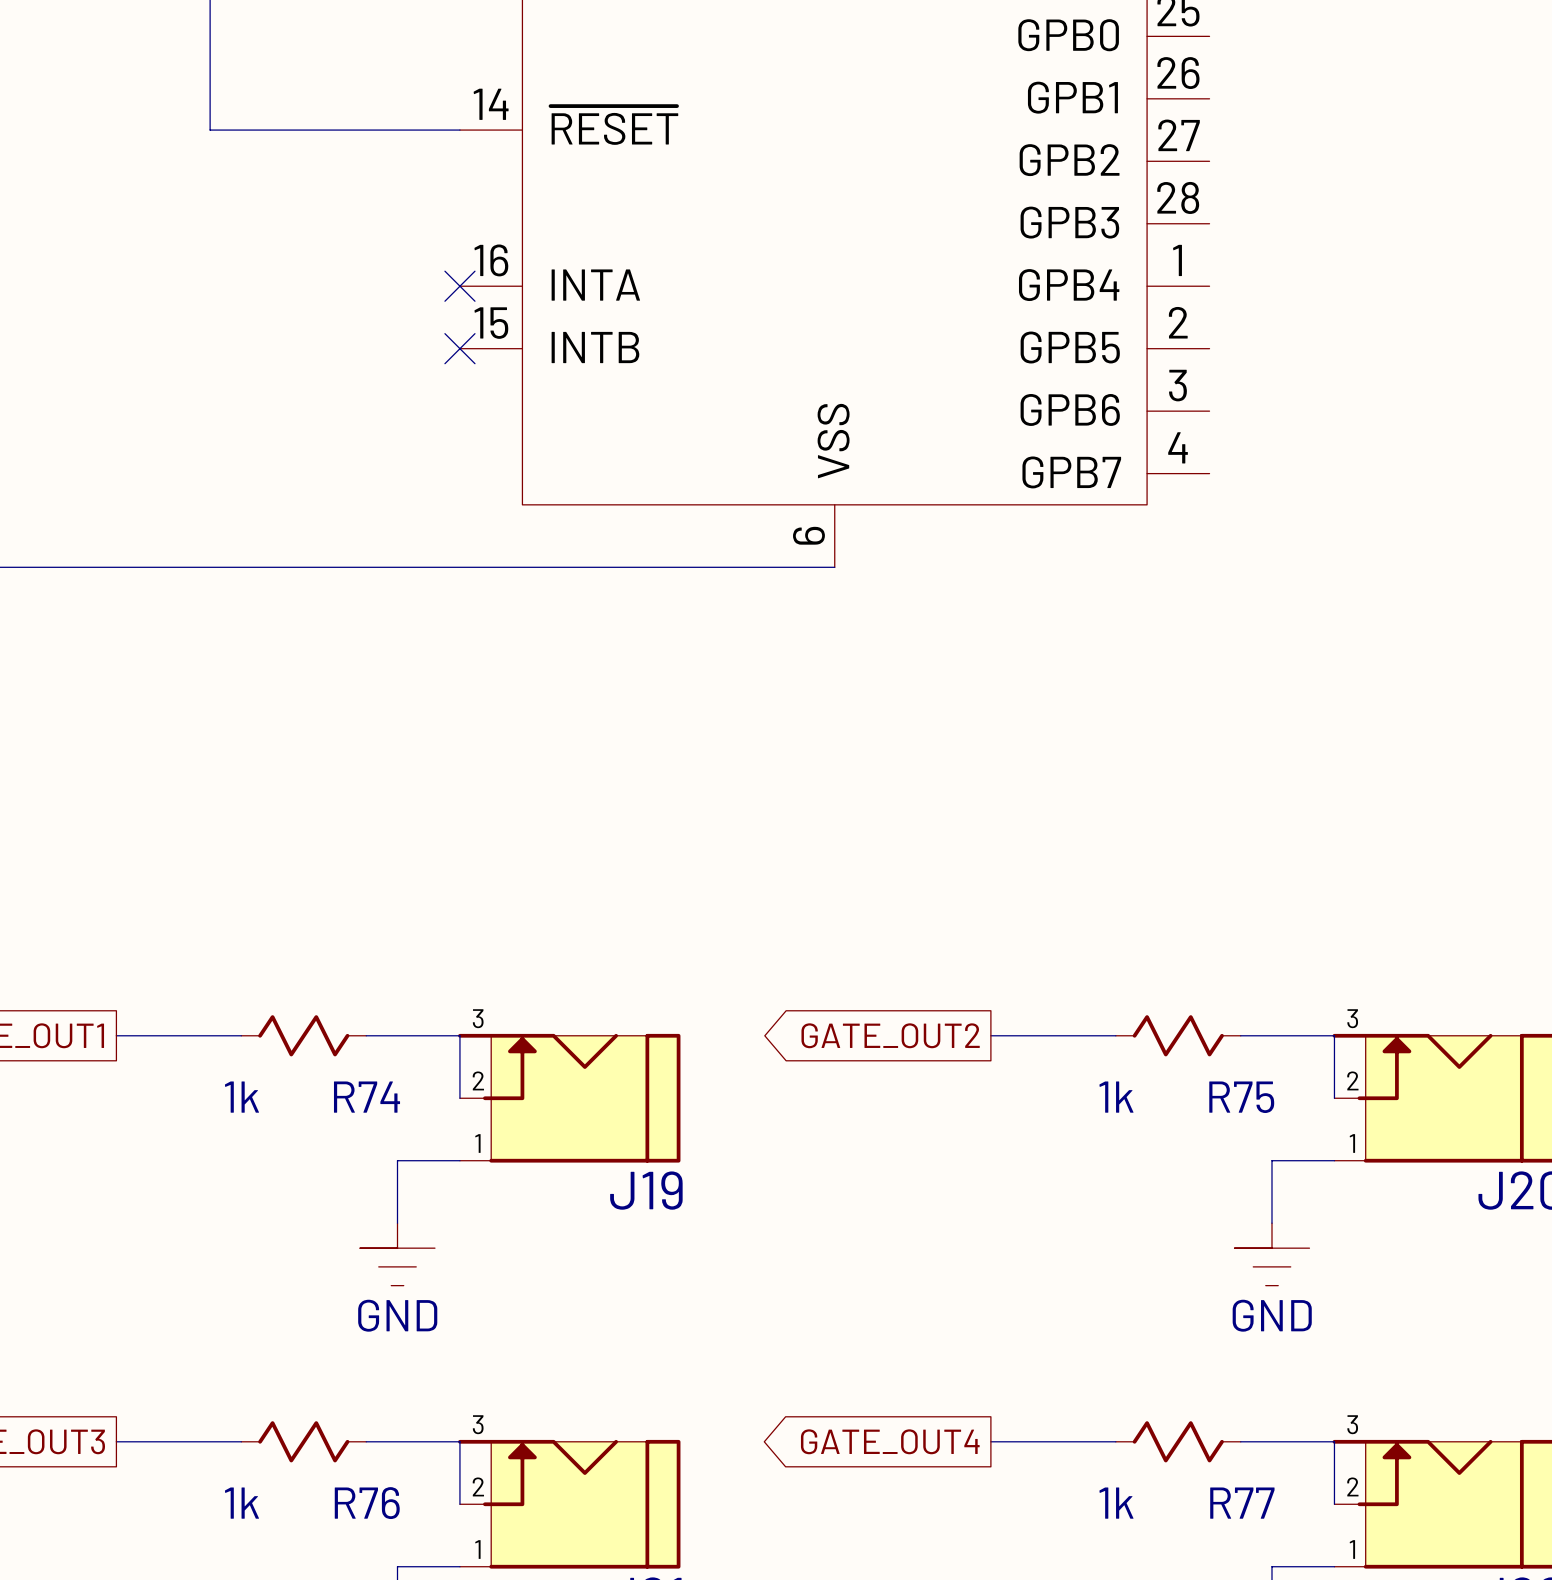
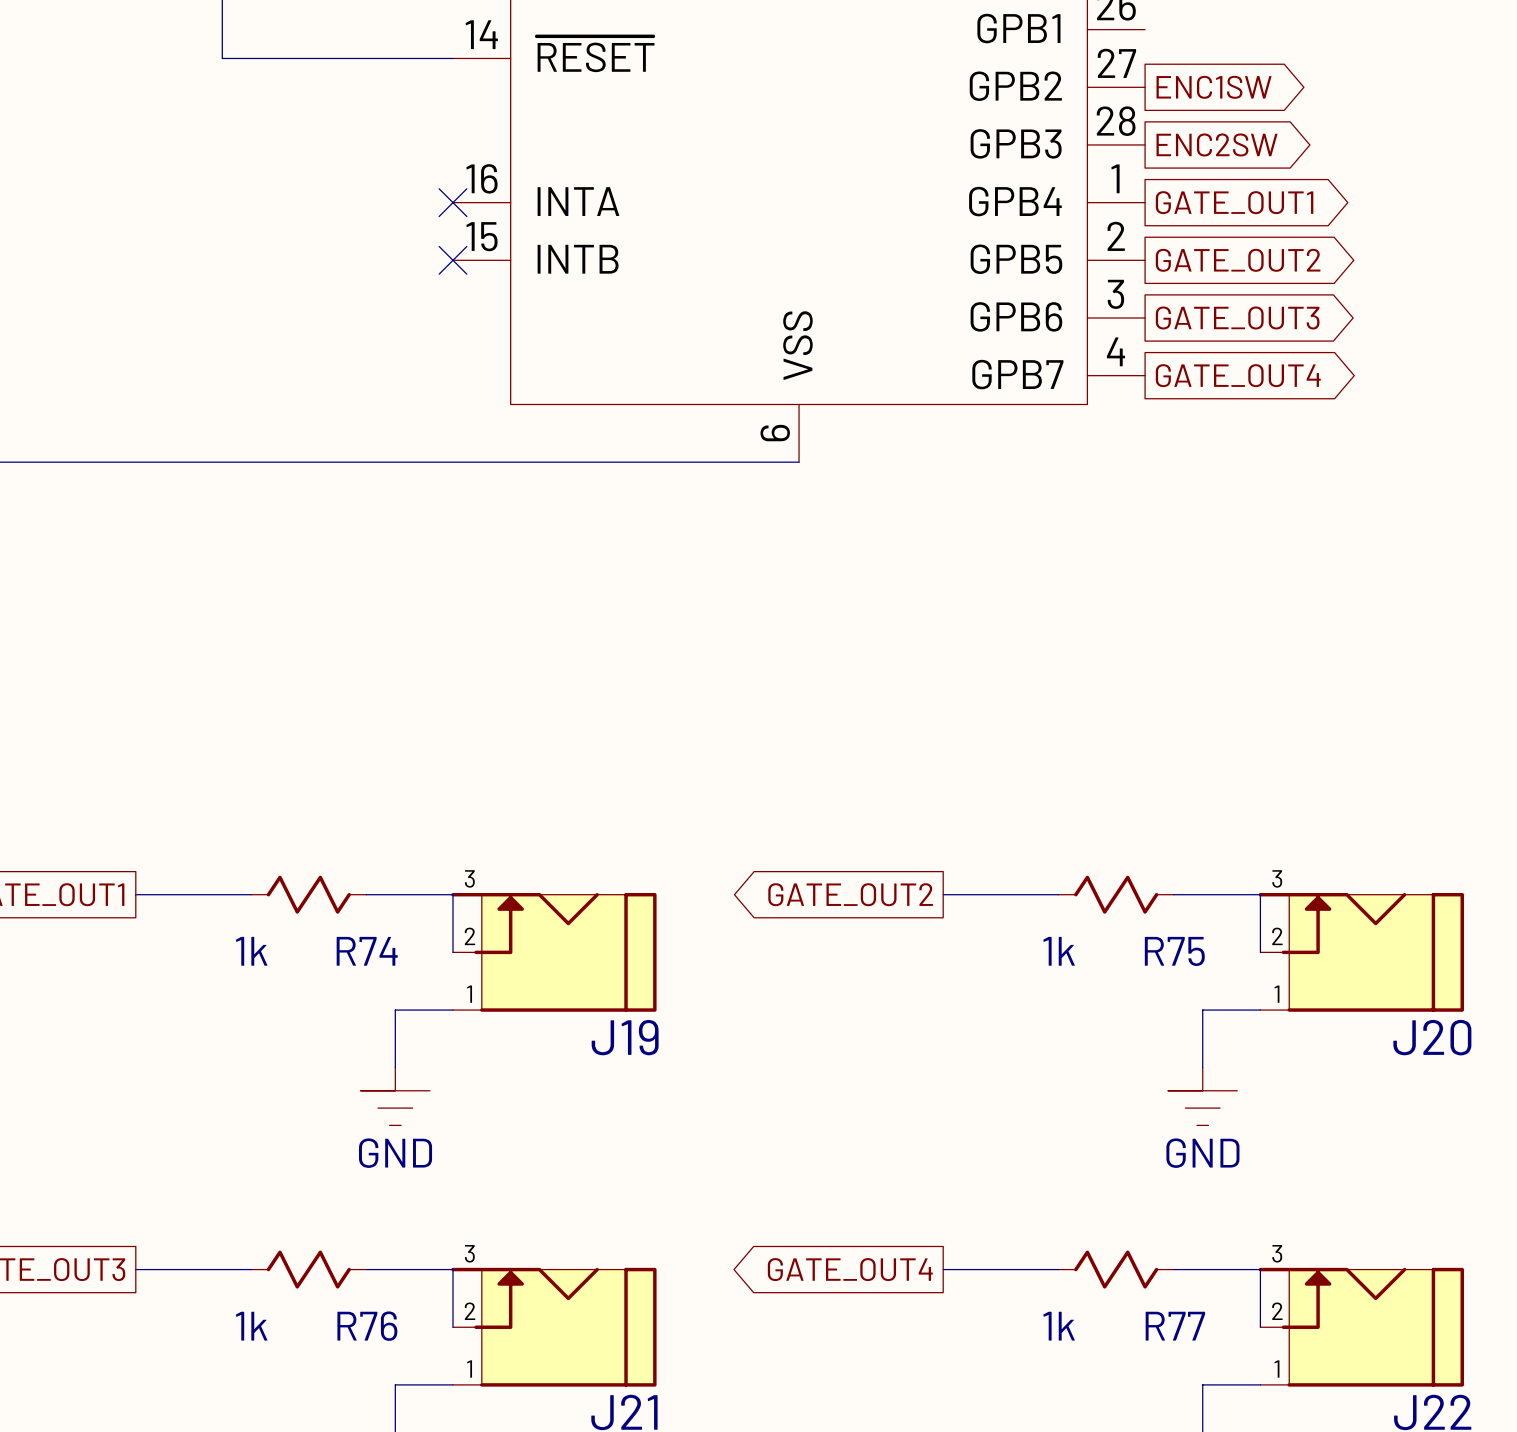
global label: none -> ENC1SW (1214, 87)
global label: none -> ENC2SW (1217, 144)
global label: none -> GATE_OUT1 (1234, 202)
global label: none -> GATE_OUT2 (1238, 260)
global label: none -> GATE_OUT3 (1237, 317)
global label: none -> GATE_OUT4 (1238, 375)

